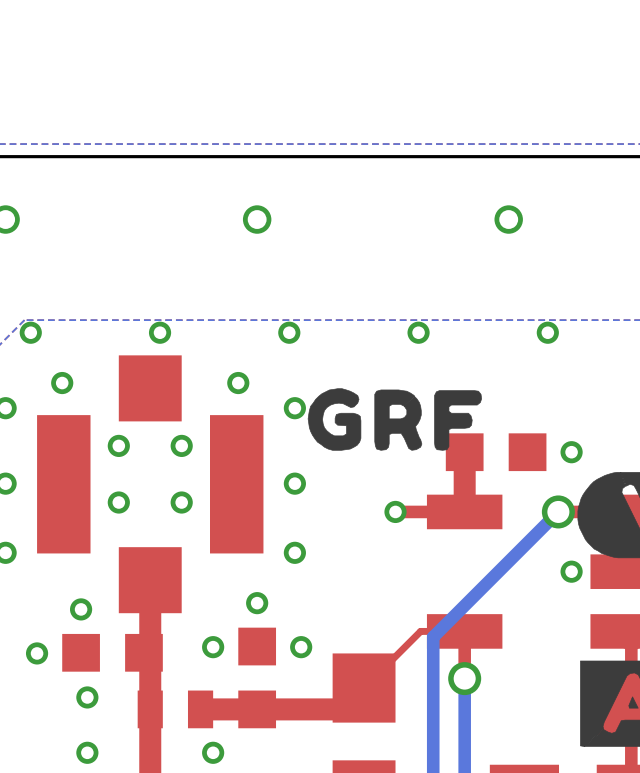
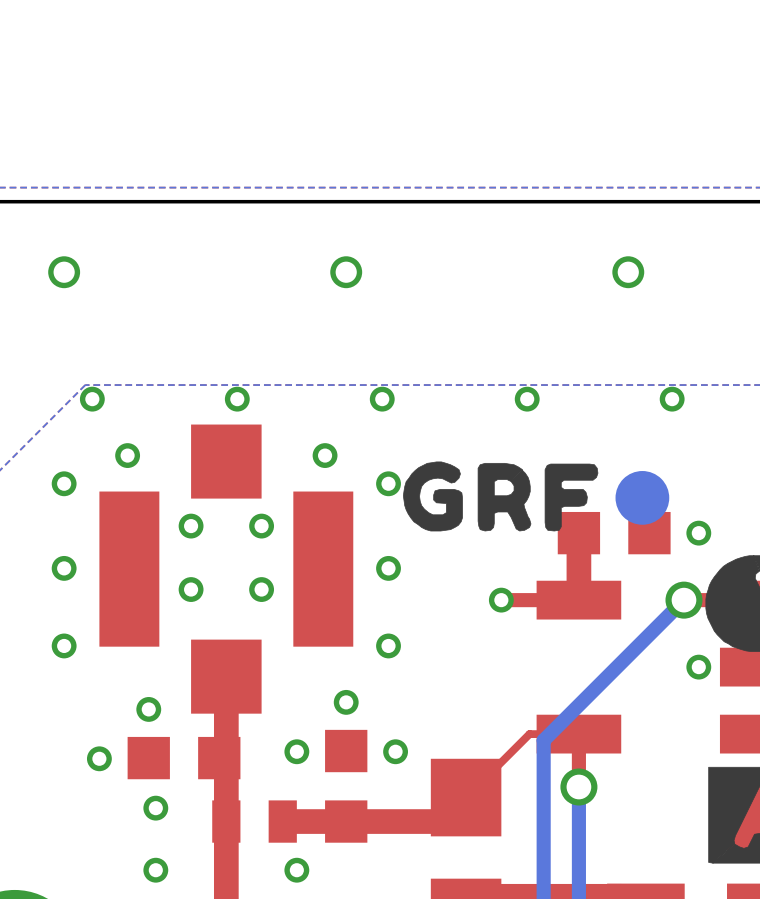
part: none -> (642, 497)

